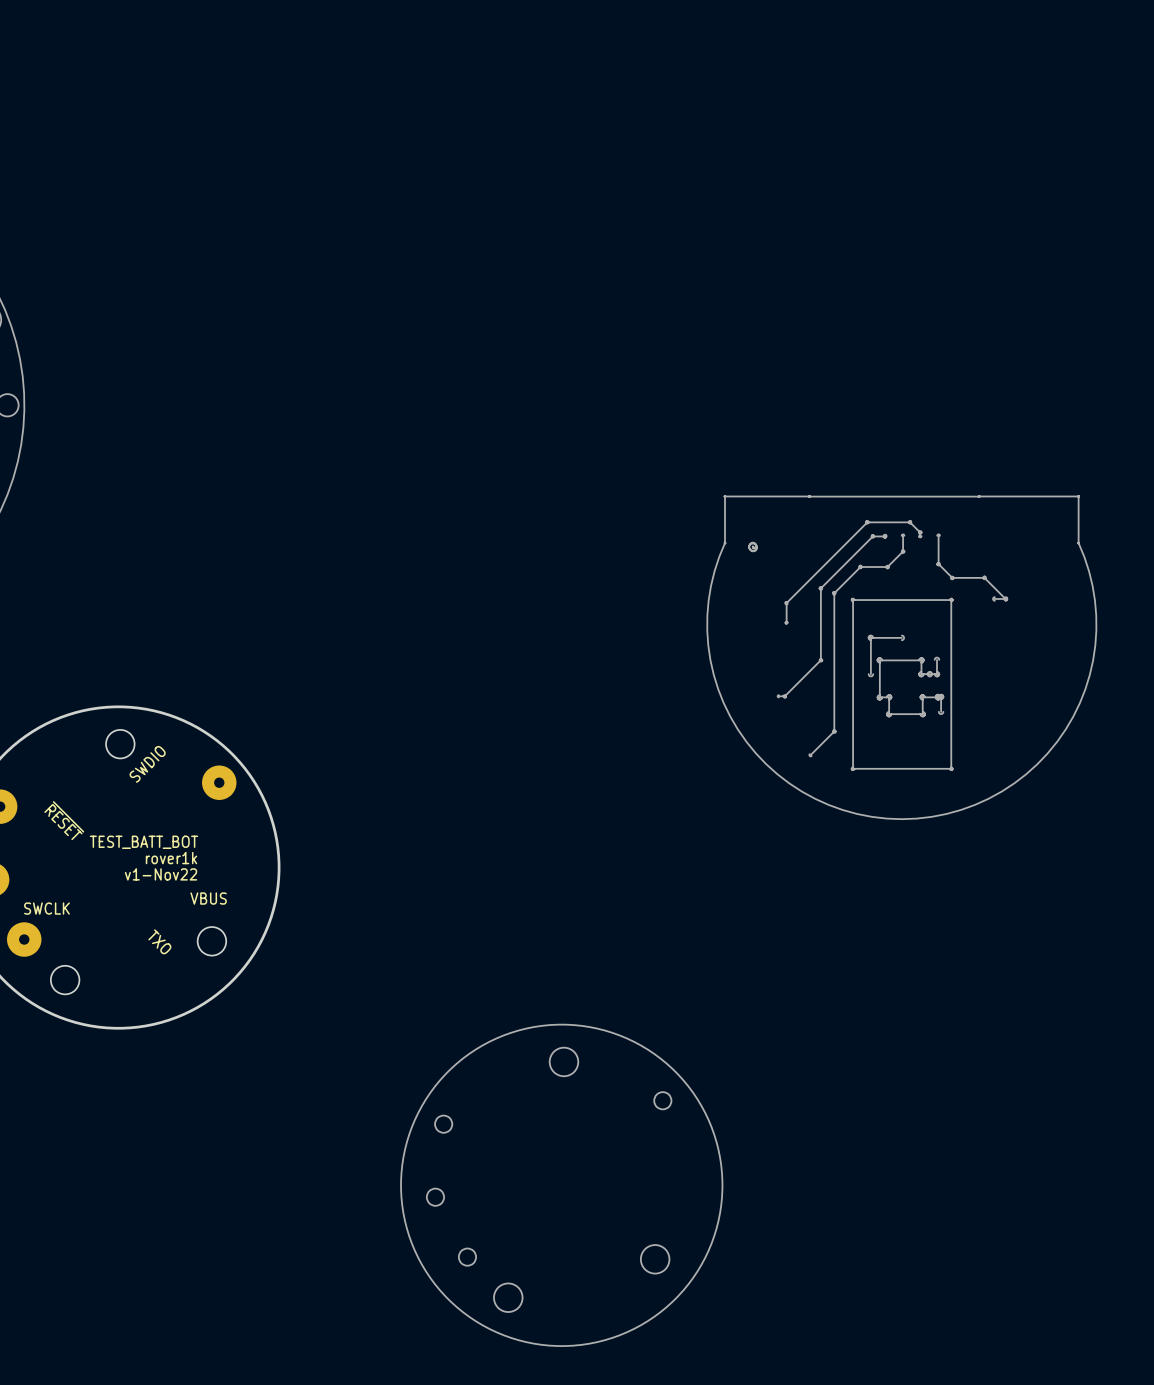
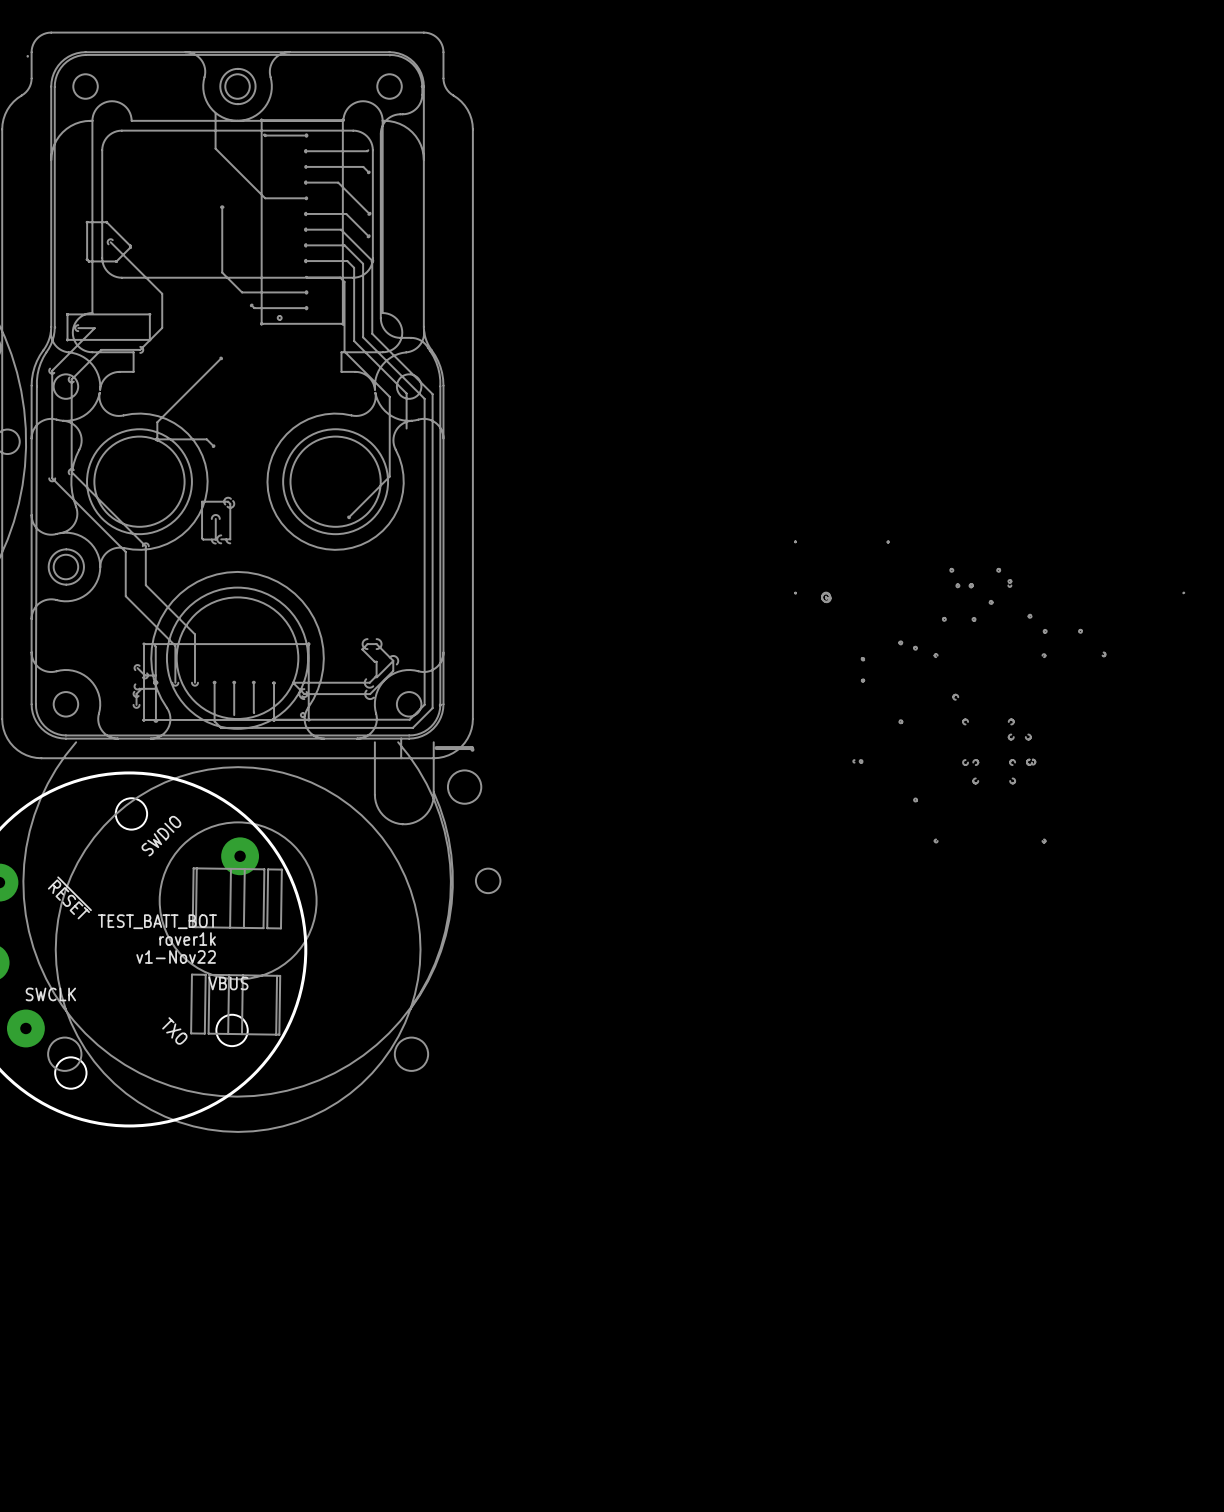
line: none -> (51, 32) (423, 32) (433, 35) (440, 42) (443, 49) (444, 85) (467, 109) (472, 129) (472, 719) (467, 738) (453, 752) (433, 758) (41, 758) (21, 752) (7, 738) (2, 719) (2, 129) (7, 109) (30, 85) (31, 49) (34, 42) (41, 35) (51, 32)
line: none -> (185, 52) (196, 55) (203, 63) (205, 72) (203, 92) (210, 107) (222, 117) (237, 120) (252, 117) (264, 107) (271, 92) (269, 72) (271, 63) (278, 55) (289, 52)
line: none -> (27, 55) (27, 56)
line: none -> (85, 54) (394, 55) (409, 61) (419, 74) (422, 94) (418, 106) (410, 112) (390, 116) (384, 121) (380, 131) (380, 318) (383, 328) (390, 335) (397, 337) (416, 338) (424, 343) (436, 362) (440, 380) (440, 705) (436, 720) (424, 731) (409, 735) (65, 735) (50, 731) (39, 719) (35, 704) (36, 380) (40, 363) (50, 344) (54, 331) (54, 82) (56, 74) (63, 64) (73, 57) (85, 54)
line: none -> (237, 68) (250, 74) (255, 86) (250, 98) (237, 104) (225, 98) (220, 86) (225, 74) (237, 68)
drawing: none -> [72, 73, 99, 100]
drawing: none -> [224, 73, 251, 100]
drawing: none -> [376, 73, 403, 100]
line: none -> (215, 113) (215, 148) (265, 198) (306, 198)
line: none -> (261, 120) (342, 120) (342, 323) (261, 323) (261, 120)
line: none -> (92, 120) (92, 313) (84, 314) (76, 320) (72, 335) (76, 344) (87, 351) (133, 352) (133, 371) (110, 374) (103, 380) (100, 389) (99, 378) (92, 364) (80, 355) (58, 348) (52, 341) (51, 330)
line: none -> (92, 120) (75, 123) (62, 132) (54, 145) (51, 160)
line: none -> (92, 120) (98, 106) (112, 101) (125, 106) (131, 120) (343, 120) (344, 113) (351, 105) (365, 101) (378, 108) (382, 120)
line: none -> (382, 120) (399, 123) (412, 132) (420, 145) (423, 160)
line: none -> (382, 120) (382, 313) (390, 314) (398, 320) (402, 335) (398, 344) (387, 351) (341, 352) (341, 371) (364, 374) (371, 380) (374, 389) (377, 374) (382, 364) (395, 355) (416, 348) (422, 341) (424, 330)
line: none -> (121, 130) (353, 130) (363, 133) (370, 140) (372, 150) (372, 258) (370, 267) (363, 275) (353, 277) (121, 277) (112, 275) (106, 270) (102, 260) (102, 147) (109, 134) (121, 130)
line: none -> (263, 134) (265, 136)
line: none -> (306, 134) (306, 136)
line: none -> (264, 135) (306, 135)
line: none -> (306, 149) (306, 152)
line: none -> (368, 150) (306, 151)
line: none -> (306, 165) (306, 167)
line: none -> (306, 166) (363, 166) (368, 172)
line: none -> (369, 171) (367, 172)
line: none -> (306, 181) (306, 183)
line: none -> (306, 182) (338, 182) (369, 213)
line: none -> (306, 197) (306, 199)
line: none -> (221, 207) (223, 207)
line: none -> (222, 207) (222, 272) (242, 292) (306, 292)
line: none -> (306, 212) (306, 215)
line: none -> (370, 212) (368, 214)
line: none -> (306, 213) (346, 213) (368, 236)
line: none -> (87, 222) (87, 259) (89, 261) (116, 261) (130, 247) (106, 222) (87, 222)
line: none -> (306, 228) (306, 230)
line: none -> (306, 229) (341, 229) (372, 260) (372, 333) (432, 394) (432, 708) (412, 727) (221, 727) (214, 721) (214, 682)
line: none -> (369, 235) (367, 236)
line: none -> (112, 240) (108, 240) (108, 244)
line: none -> (110, 242) (162, 293) (162, 327) (140, 349) (101, 349) (71, 379) (71, 472) (145, 546) (145, 585) (194, 634) (194, 682)
line: none -> (306, 244) (306, 246)
line: none -> (306, 245) (344, 245) (363, 263) (363, 337) (424, 398) (424, 704) (409, 719) (274, 719) (273, 682)
line: none -> (306, 259) (306, 262)
line: none -> (306, 261) (347, 261) (354, 267) (354, 341) (406, 393) (406, 428)
line: none -> (306, 276) (340, 277) (344, 281) (344, 351) (389, 396) (389, 476) (349, 517)
line: none -> (306, 291) (306, 293)
line: none -> (252, 304) (251, 306)
line: none -> (251, 305) (254, 308) (306, 308)
line: none -> (306, 306) (306, 309)
line: none -> (67, 314) (67, 339) (149, 339) (149, 314) (67, 314)
line: none -> (279, 315) (281, 317) (279, 319) (277, 317) (279, 315)
line: none -> (78, 325) (75, 328) (78, 331)
line: none -> (78, 328) (94, 328) (52, 370) (52, 478) (125, 551) (125, 596) (175, 645) (175, 682)
line: none -> (51, 330) (51, 82) (53, 73) (61, 62) (72, 54) (85, 52) (389, 52) (398, 53) (410, 59) (421, 73) (423, 86) (424, 330)
line: none -> (51, 330) (47, 344) (34, 366) (31, 385) (31, 704) (34, 717) (41, 728) (52, 736) (65, 738) (409, 738) (422, 736) (433, 728) (440, 717) (443, 704) (443, 385) (440, 366) (428, 344) (424, 330)
line: none -> (140, 346) (143, 349) (140, 352)
line: none -> (220, 357) (221, 359)
line: none -> (221, 358) (157, 422) (157, 439) (206, 439) (213, 446)
line: none -> (50, 368) (50, 372) (54, 372)
drawing: none -> [52, 373, 80, 400]
drawing: none -> [395, 373, 423, 400]
line: none -> (69, 377) (69, 381) (73, 381)
line: none -> (63, 420) (76, 426) (81, 440) (71, 477) (76, 518) (71, 527) (60, 533)
line: none -> (63, 420) (49, 418) (41, 421) (33, 429) (31, 438)
line: none -> (63, 420) (75, 419) (86, 413) (95, 404) (99, 392) (102, 406) (111, 414) (149, 414) (174, 423) (193, 440) (205, 464) (207, 481) (205, 498) (198, 514) (188, 528) (174, 539) (158, 547) (141, 549) (119, 547) (111, 549) (104, 555) (100, 567)
line: none -> (411, 420) (425, 418) (433, 421) (441, 429) (443, 438)
line: none -> (411, 420) (399, 419) (388, 413) (379, 404) (375, 392) (372, 406) (363, 414) (325, 414) (308, 419) (293, 428) (276, 448) (267, 473) (269, 499) (281, 523) (301, 540) (326, 549) (352, 547) (376, 536) (393, 517) (400, 500) (403, 474) (393, 437) (398, 426) (411, 420)
drawing: none -> [52, 428, 193, 581]
drawing: none -> [282, 428, 390, 536]
line: none -> (214, 445) (212, 446)
line: none -> (73, 470) (69, 470) (69, 474)
line: none -> (49, 478) (52, 481) (55, 478)
line: none -> (230, 498) (225, 498) (225, 504)
line: none -> (233, 501) (233, 506) (227, 506)
line: none -> (31, 515) (33, 523) (41, 532) (49, 534) (60, 533)
line: none -> (348, 516) (349, 517)
line: none -> (211, 518) (215, 514) (219, 518)
line: none -> (215, 518) (215, 539) (203, 539) (202, 501) (228, 501) (230, 503) (230, 539) (221, 539)
line: none -> (60, 533) (77, 534) (88, 541) (97, 554) (100, 567)
line: none -> (221, 535) (217, 539) (221, 543)
line: none -> (211, 539) (215, 543)
line: none -> (226, 539) (230, 543)
line: (725, 496) (1078, 496) (1078, 543) (1089, 571) (1094, 600) (1095, 645) (1085, 689) (1073, 716) (1057, 741) (1026, 774) (1001, 791) (974, 804) (931, 816) (886, 818) (857, 814) (828, 804) (789, 783) (755, 753) (737, 729) (718, 689) (710, 660) (707, 630) (708, 600) (714, 571) (725, 543) (725, 496) -> none
line: none -> (142, 546) (145, 543) (148, 546)
line: none -> (66, 549) (78, 554) (83, 567) (78, 579) (66, 584) (53, 579) (48, 567) (53, 554) (66, 549)
line: none -> (100, 567) (96, 582) (86, 594) (72, 600) (52, 599) (43, 600) (34, 608) (31, 618)
line: (901, 535) (904, 535) -> none
line: (903, 535) (903, 551) (887, 567) (860, 567) (834, 593) (834, 731) (810, 755) -> none
line: (937, 535) (939, 535) -> none
line: (938, 535) (938, 564) (952, 577) (984, 577) (1005, 598) (994, 598) -> none
line: (885, 536) (872, 536) (820, 588) (820, 660) (784, 696) (778, 696) -> none
line: (920, 536) (920, 532) (910, 522) (867, 522) (786, 603) (786, 622) -> none
drawing: none -> [165, 586, 310, 730]
line: none -> (367, 639) (362, 644) (367, 649)
line: none -> (376, 639) (381, 644) (376, 649)
line: none -> (143, 644) (143, 719) (308, 719) (308, 644) (143, 644)
line: none -> (367, 644) (362, 649) (376, 661) (376, 675) (369, 682) (293, 682) (304, 694) (370, 694) (393, 670) (393, 660) (376, 644) (367, 644)
line: none -> (154, 645) (155, 688) (141, 688) (136, 693) (136, 704)
line: none -> (31, 652) (34, 663) (43, 670) (52, 672) (72, 670) (90, 680) (99, 697) (98, 718) (99, 726) (107, 735) (117, 738)
line: none -> (443, 652) (440, 663) (431, 670) (422, 672) (402, 670) (384, 680) (375, 697) (376, 718) (375, 726) (367, 735) (357, 738)
line: (994, 597) (993, 598) (994, 600) -> none
line: (853, 600) (951, 600) (951, 768) (853, 768) (853, 600) -> none
line: none -> (389, 657) (396, 657) (396, 664)
line: none -> (393, 660) (375, 677)
line: none -> (139, 665) (135, 665) (135, 670)
line: none -> (137, 668) (144, 675) (155, 675)
line: none -> (147, 673) (147, 677) (142, 677)
line: none -> (366, 679) (366, 686) (373, 686)
line: none -> (155, 682) (155, 720)
line: none -> (172, 682) (175, 685) (178, 682)
line: none -> (191, 682) (194, 685) (197, 682)
line: none -> (213, 682) (215, 682)
line: none -> (233, 682) (235, 682)
line: none -> (234, 682) (234, 715)
line: none -> (252, 682) (254, 682)
line: none -> (253, 682) (254, 712)
line: none -> (273, 683) (275, 683)
line: none -> (135, 684) (135, 688) (139, 688)
line: none -> (304, 689) (299, 694) (304, 699)
line: none -> (366, 690) (366, 697) (373, 697)
drawing: none -> [52, 691, 80, 718]
line: none -> (134, 691) (134, 696) (138, 696)
drawing: none -> [395, 691, 423, 718]
line: none -> (306, 691) (306, 696) (302, 696)
line: (901, 635) (904, 637) (901, 640) -> none
line: (901, 637) (870, 637) (870, 674) -> none
line: none -> (133, 704) (136, 707) (139, 704)
line: none -> (302, 713) (304, 715) (302, 717) (300, 715) (302, 713)
line: none -> (154, 720) (157, 720)
line: (934, 659) (936, 657) (939, 659) -> none
line: (936, 659) (936, 674) (921, 674) (921, 660) (879, 660) (879, 697) (889, 697) (889, 714) (922, 714) (922, 697) (938, 697) -> none
line: (929, 671) (932, 674) (929, 676) (927, 674) (929, 671) -> none
line: (868, 674) (870, 676) (873, 674) -> none
line: none -> (150, 738) (163, 733) (170, 721) (169, 711) (157, 689) (151, 669) (151, 648) (160, 618) (172, 601) (188, 587) (206, 577) (237, 571) (268, 577) (286, 587) (302, 601) (314, 618) (323, 648) (323, 669) (318, 689) (305, 711) (304, 721) (311, 733) (324, 738)
line: none -> (401, 738) (401, 758)
line: none -> (76, 742) (56, 769) (40, 799) (26, 847) (23, 881) (25, 914) (33, 947) (46, 978) (74, 1021) (97, 1044) (124, 1064) (170, 1086) (203, 1093) (237, 1096) (270, 1093) (303, 1086) (349, 1064) (376, 1044) (400, 1021) (428, 978) (440, 947) (448, 914) (450, 881) (448, 847) (433, 799) (418, 769) (398, 742)
line: none -> (374, 742) (374, 794) (376, 805) (385, 817) (402, 824) (412, 823) (421, 818) (431, 804) (433, 742)
line: none -> (436, 748) (471, 748) (472, 749)
line: (938, 697) (941, 697) (941, 711) -> none
drawing: none -> [446, 769, 483, 805]
line: (938, 711) (941, 714) (943, 711) -> none
line: none -> (433, 792) (444, 822) (451, 854) (451, 903) (445, 935) (435, 966) (410, 1008)
drawing: none -> [158, 821, 318, 981]
line: (809, 754) (811, 756) -> none
line: none -> (196, 868) (193, 868) (192, 927) (195, 927)
line: none -> (196, 868) (195, 927)
line: none -> (196, 868) (264, 869) (263, 928) (195, 927)
drawing: none -> [474, 867, 502, 895]
line: none -> (230, 868) (230, 927)
line: none -> (244, 869) (243, 927)
line: none -> (268, 869) (281, 869) (280, 928) (267, 928) (268, 869)
line: none -> (191, 974) (191, 1033) (204, 1033) (205, 974) (191, 974)
line: none -> (229, 975) (209, 974) (208, 1033) (228, 1033)
line: none -> (229, 975) (228, 1033)
line: none -> (229, 975) (242, 975)
line: none -> (242, 975) (277, 975)
line: none -> (242, 975) (241, 1034)
line: none -> (277, 975) (280, 975) (279, 1034) (276, 1034)
line: none -> (277, 975) (276, 1034)
line: none -> (410, 1008) (419, 964) (419, 934) (414, 904) (398, 862) (382, 837) (361, 815) (337, 796) (297, 777) (253, 767) (223, 767) (178, 777) (151, 789) (126, 805) (103, 826) (77, 862) (65, 890) (56, 934) (56, 964) (61, 994) (71, 1022) (85, 1049) (114, 1083) (138, 1102) (178, 1122) (208, 1129) (238, 1131) (282, 1126) (311, 1116) (337, 1102) (372, 1073) (398, 1036) (410, 1008)
line: none -> (228, 1033) (241, 1034)
line: none -> (241, 1034) (276, 1034)
drawing: none -> [47, 1036, 83, 1072]
drawing: none -> [393, 1036, 430, 1072]
drawing: [400, 1023, 724, 1347] -> none

